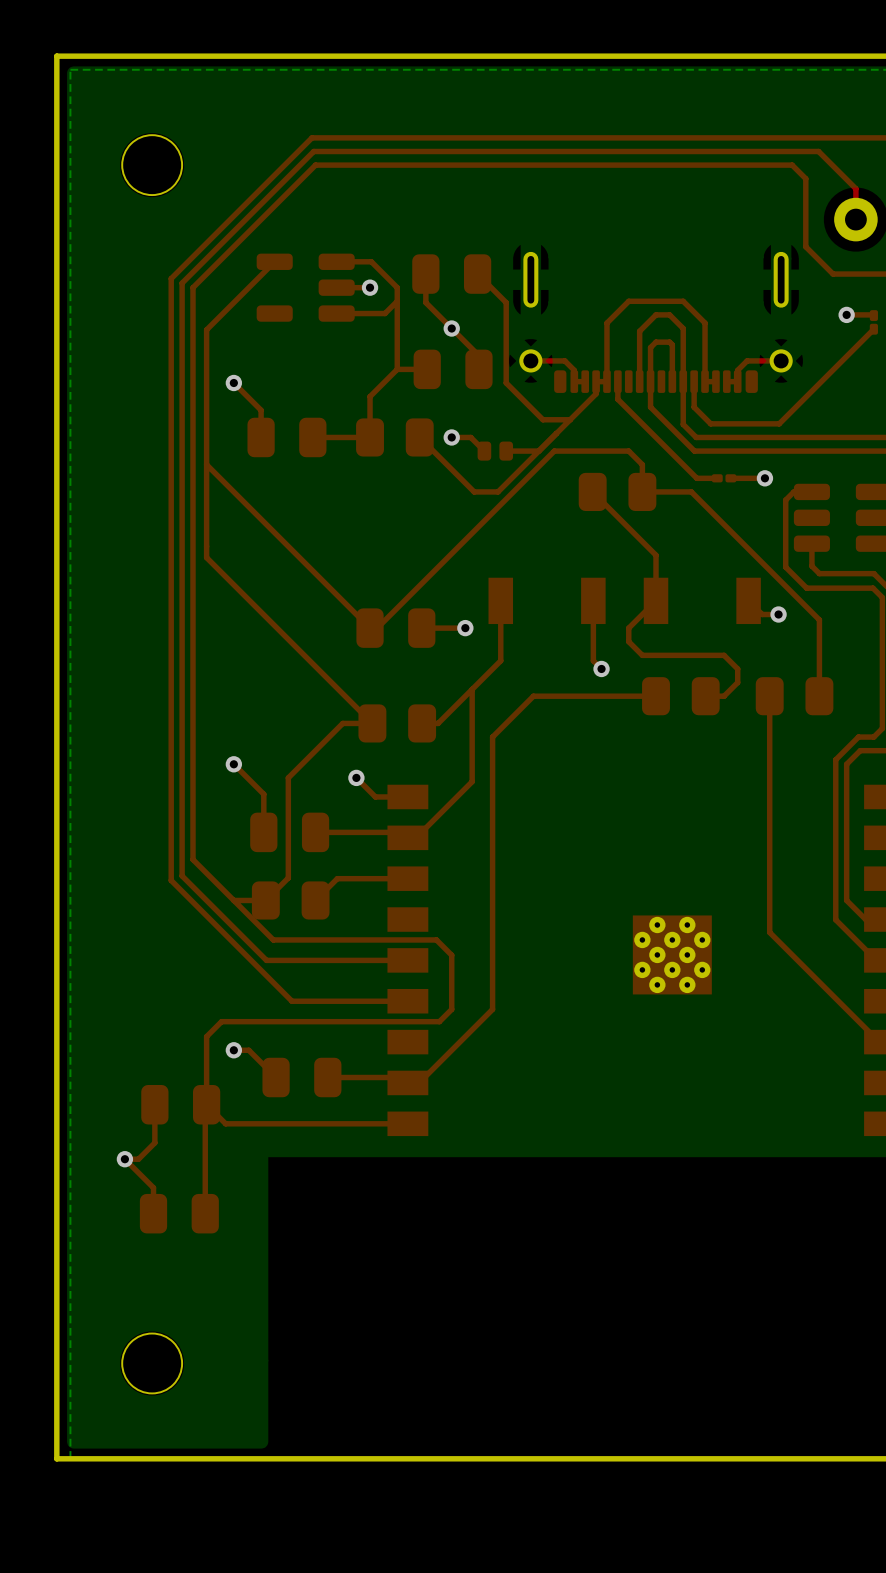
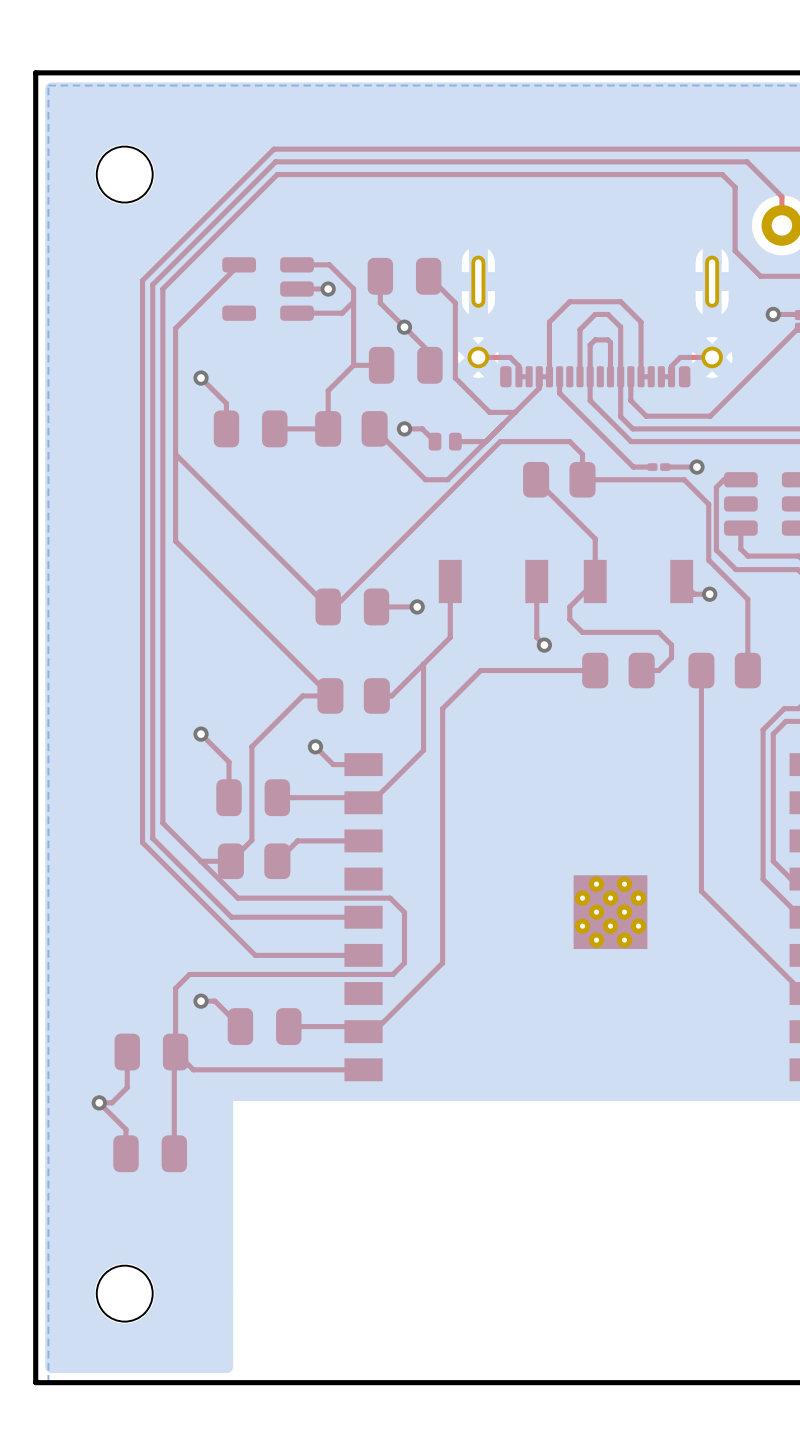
top track: (691, 491) (777, 578) -> (628, 479) (684, 479) (708, 504) (708, 560)

